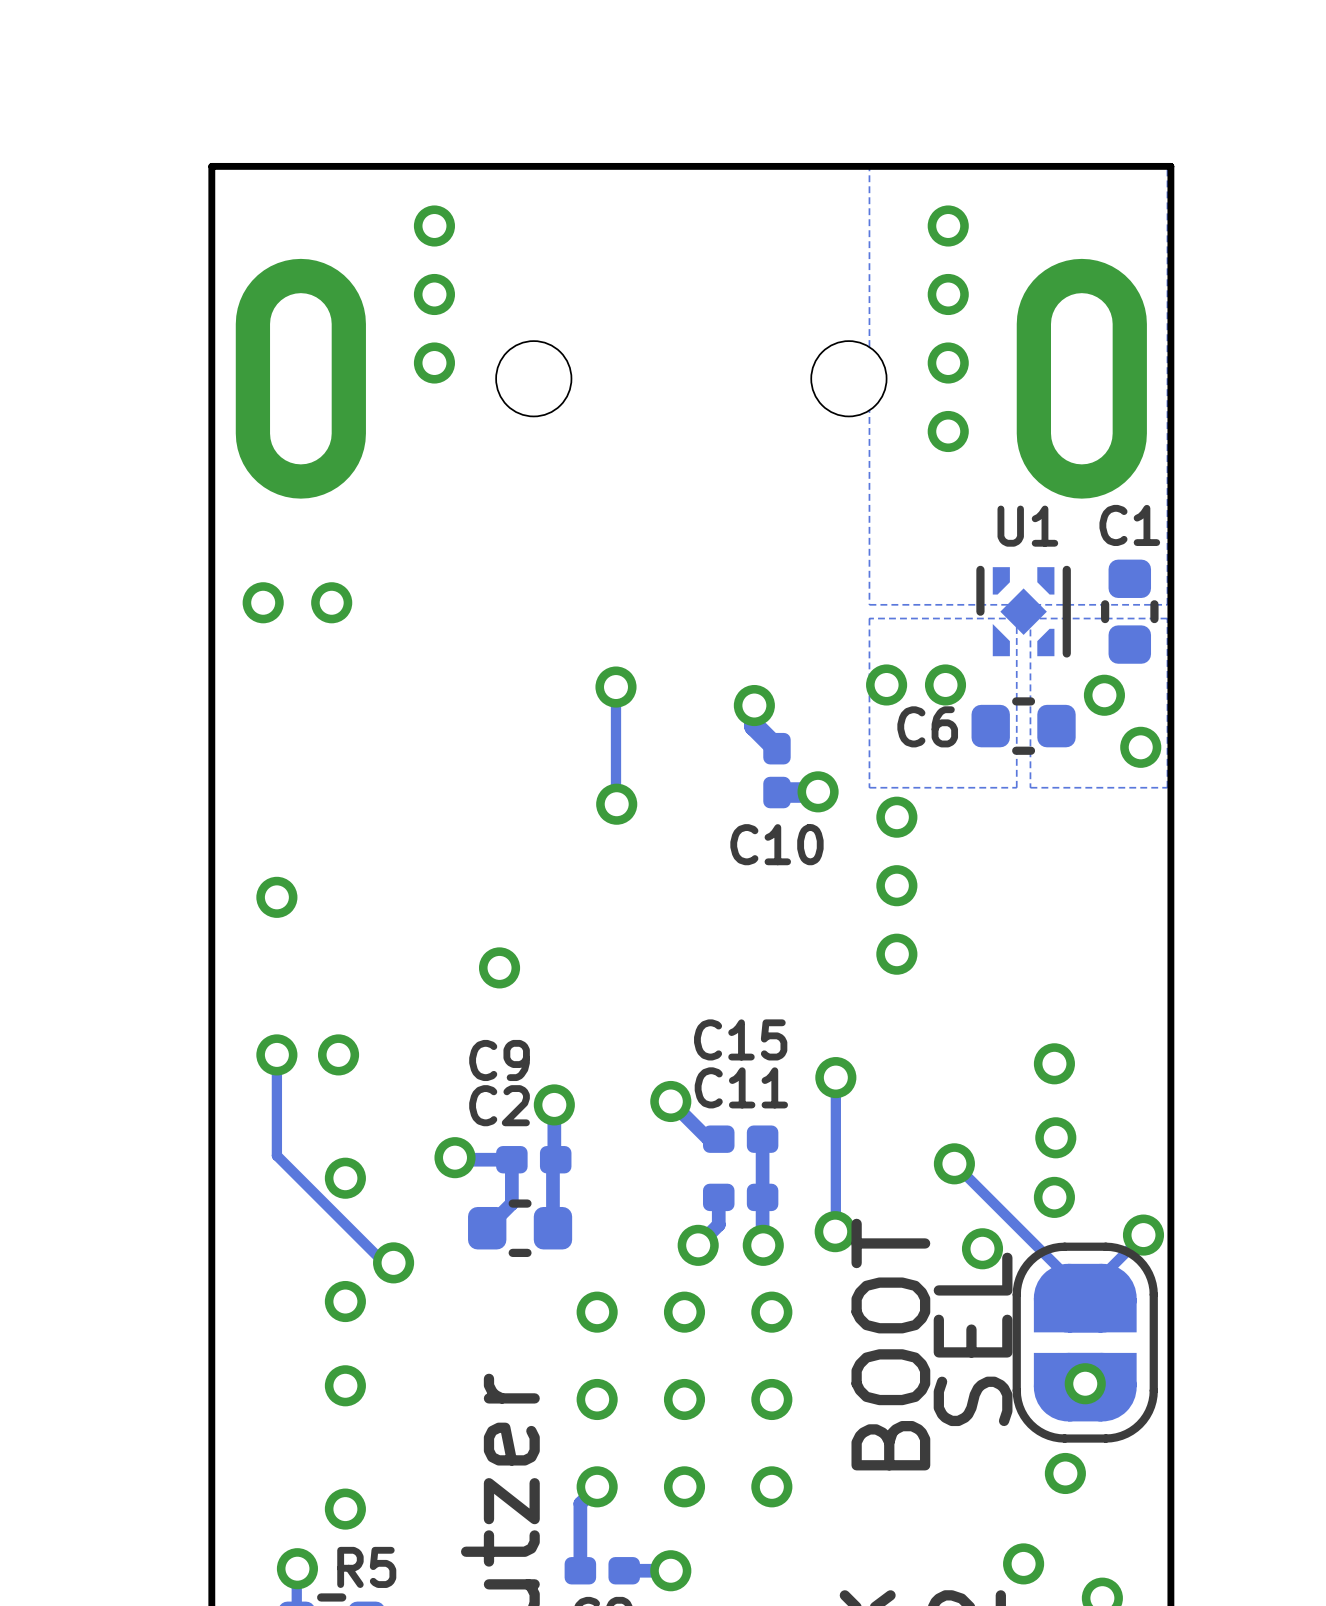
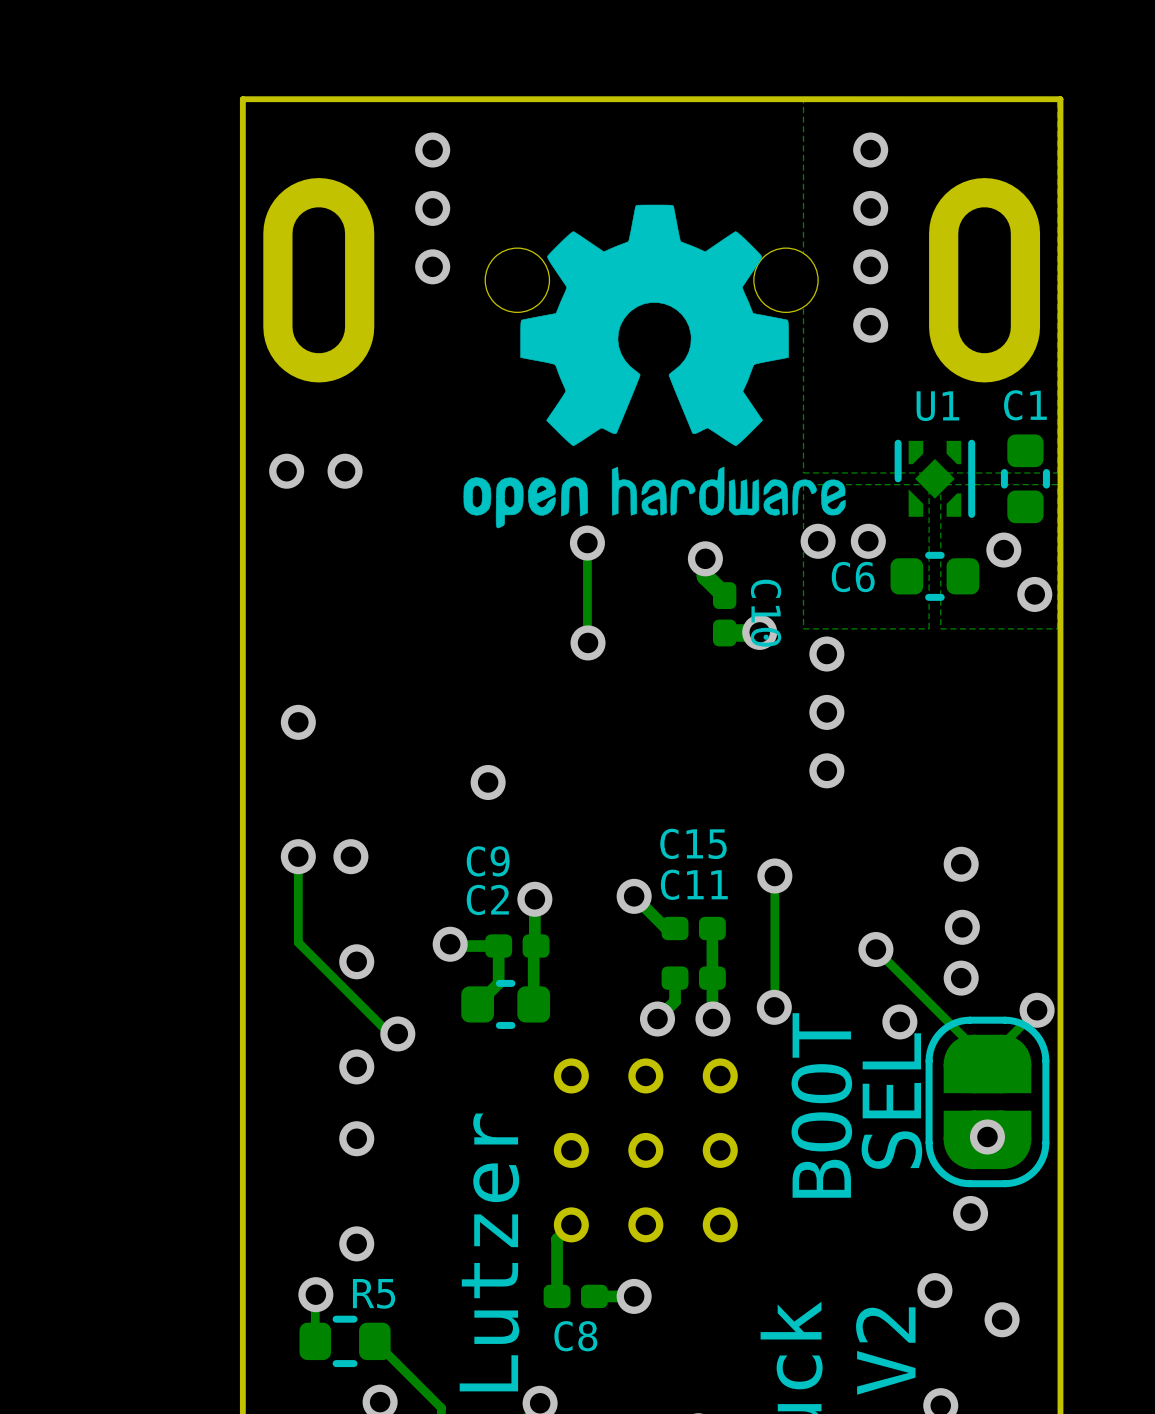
drawing: none -> [463, 204, 846, 529]
C10 name rotation: 0° (776, 844) -> 90° clockwise (766, 613)

